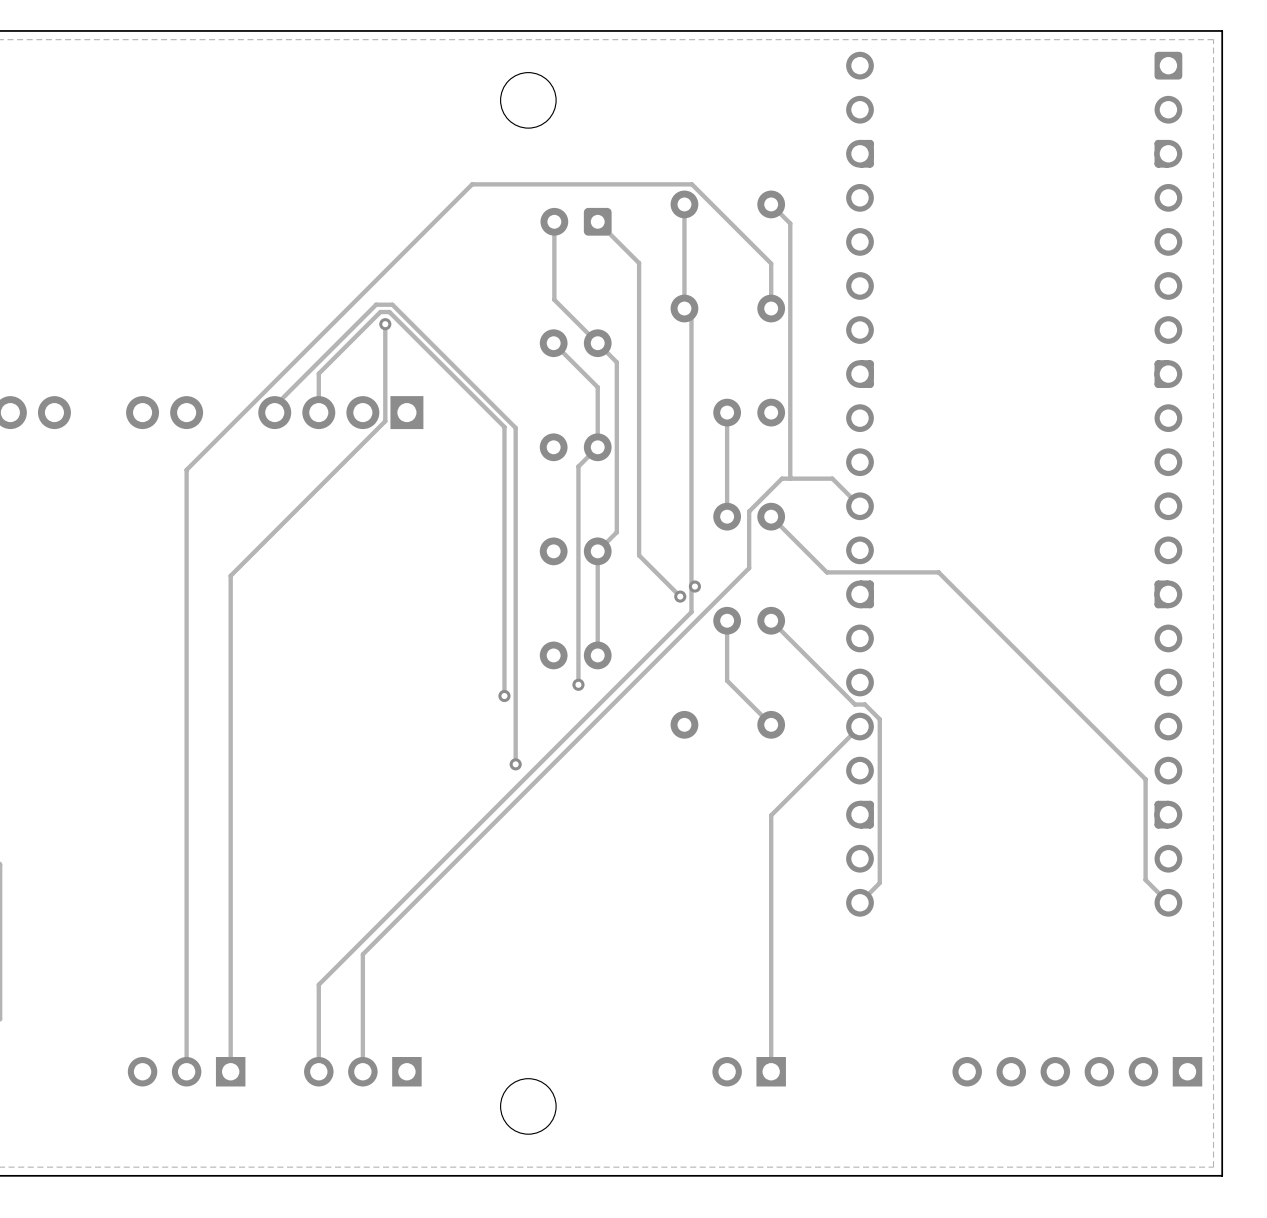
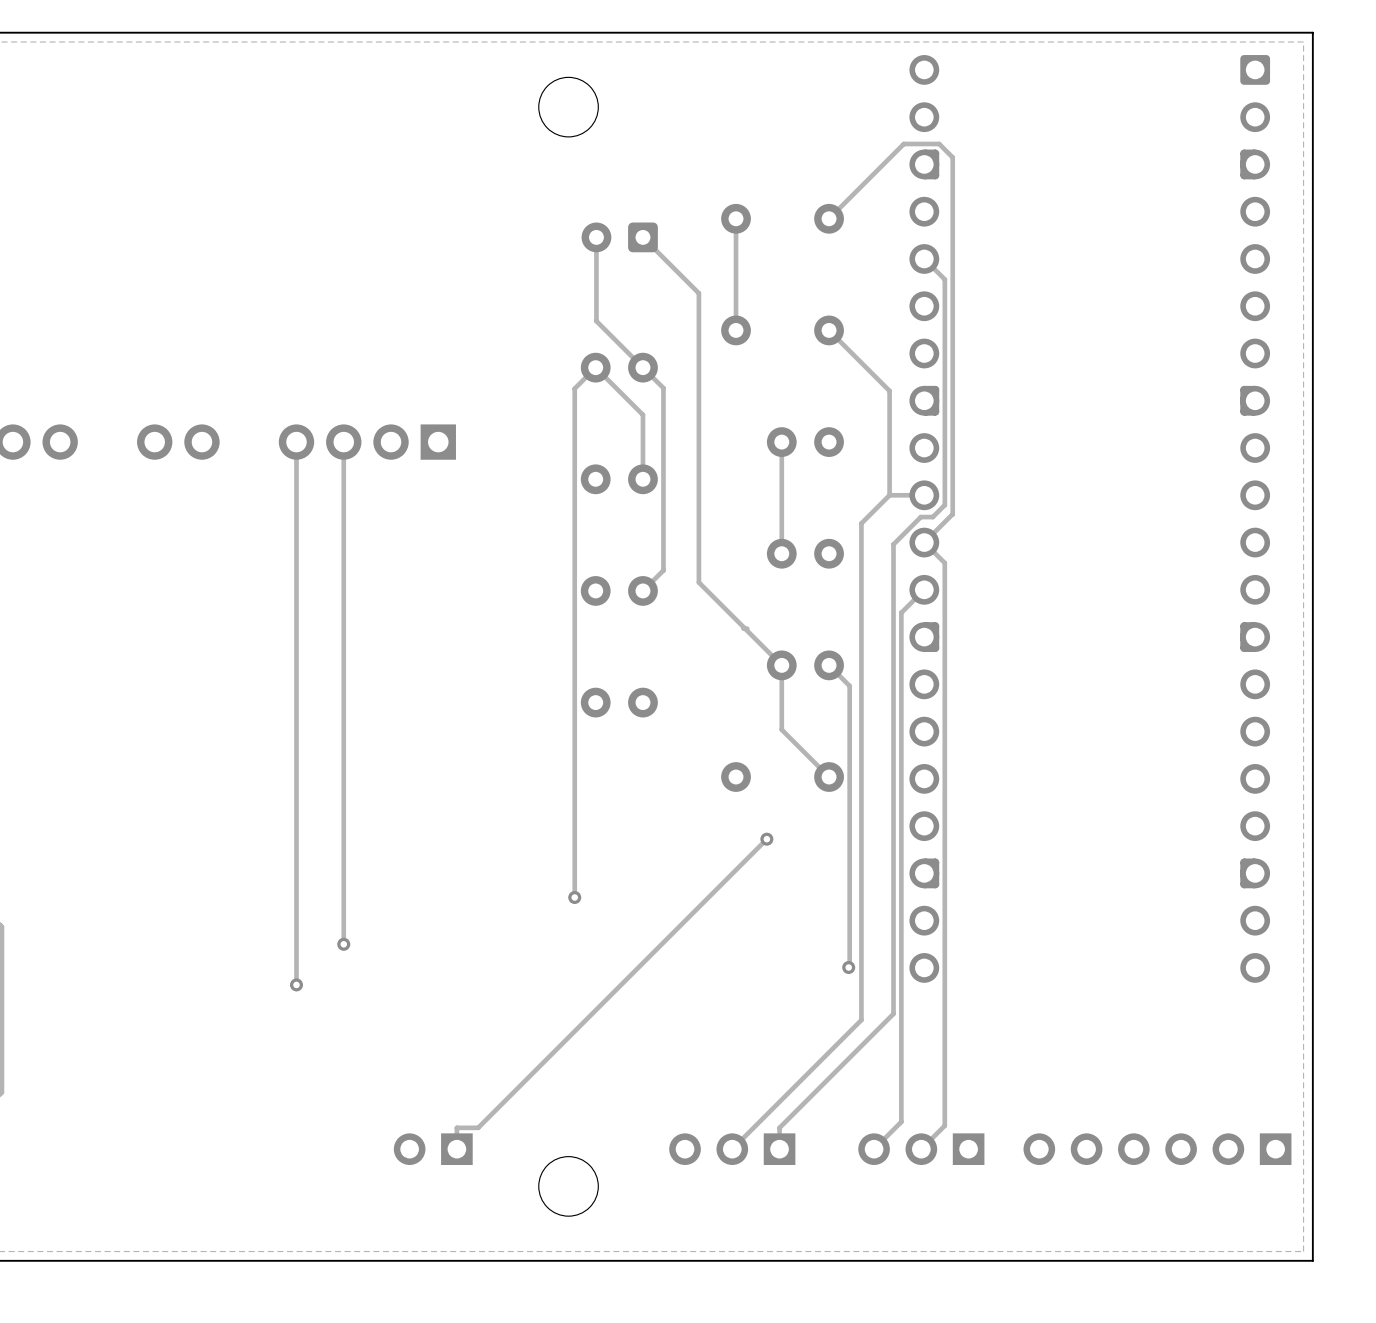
track: (771, 204) (790, 223) (790, 478) -> (829, 218) (903, 143) (939, 143) (952, 157) (952, 514) (924, 542) (944, 563) (944, 1125) (921, 1149)
track: none -> (924, 258) (944, 279) (944, 505) (932, 517) (920, 517) (893, 544) (893, 1013) (779, 1127) (779, 1149)
track: (639, 263) (639, 555) (680, 596) -> (687, 281) (698, 293) (698, 582) (781, 665)
track: (684, 308) (691, 315) (691, 612) (318, 984) (318, 1071) -> none
track: (771, 308) (771, 263) (691, 184) (472, 184) (186, 469) (186, 1071) -> (829, 330) (889, 390) (889, 495)
track: (385, 324) (385, 421) (230, 575) (230, 1071) -> none
via: (385, 324) -> none
track: none -> (595, 367) (574, 388) (574, 897)
track: (274, 412) (274, 406) (376, 304) (392, 304) (515, 427) (515, 764) -> (296, 442) (296, 984)
track: (318, 412) (318, 373) (380, 312) (389, 312) (504, 427) (504, 696) -> (343, 442) (343, 944)
track: (597, 447) (578, 466) (578, 684) -> none
track: none -> (889, 495) (861, 523) (861, 1020) (732, 1149)
track: none -> (924, 495) (889, 495)
track: (860, 506) (832, 478) (782, 478) (749, 511) (749, 568) (362, 954) (362, 1071) -> none
track: (771, 516) (826, 572) (938, 572) (1145, 779) (1145, 879) (1168, 902) -> none
track: none -> (924, 589) (901, 612) (901, 1121) (874, 1149)
track: (597, 551) (597, 655) -> none
via: (694, 586) -> none
via: (680, 596) -> none
track: (790, 639) (854, 704) (864, 704) (879, 719) (879, 883) (860, 902) -> (849, 685) (848, 967)
via: (578, 684) -> none
via: (504, 696) -> none
track: (860, 726) (771, 815) (771, 1071) -> none
via: (515, 764) -> none
track: none -> (766, 839) (478, 1127) (456, 1127) (456, 1149)
via: none -> (766, 839)
via: none -> (574, 897)
via: none -> (343, 944)
via: none -> (848, 967)
via: none -> (296, 984)
part: (186, 1071) -> none
part: (362, 1071) -> none
part: none -> (732, 1149)
part position: (749, 1071) -> (433, 1149)
part: none -> (921, 1149)

